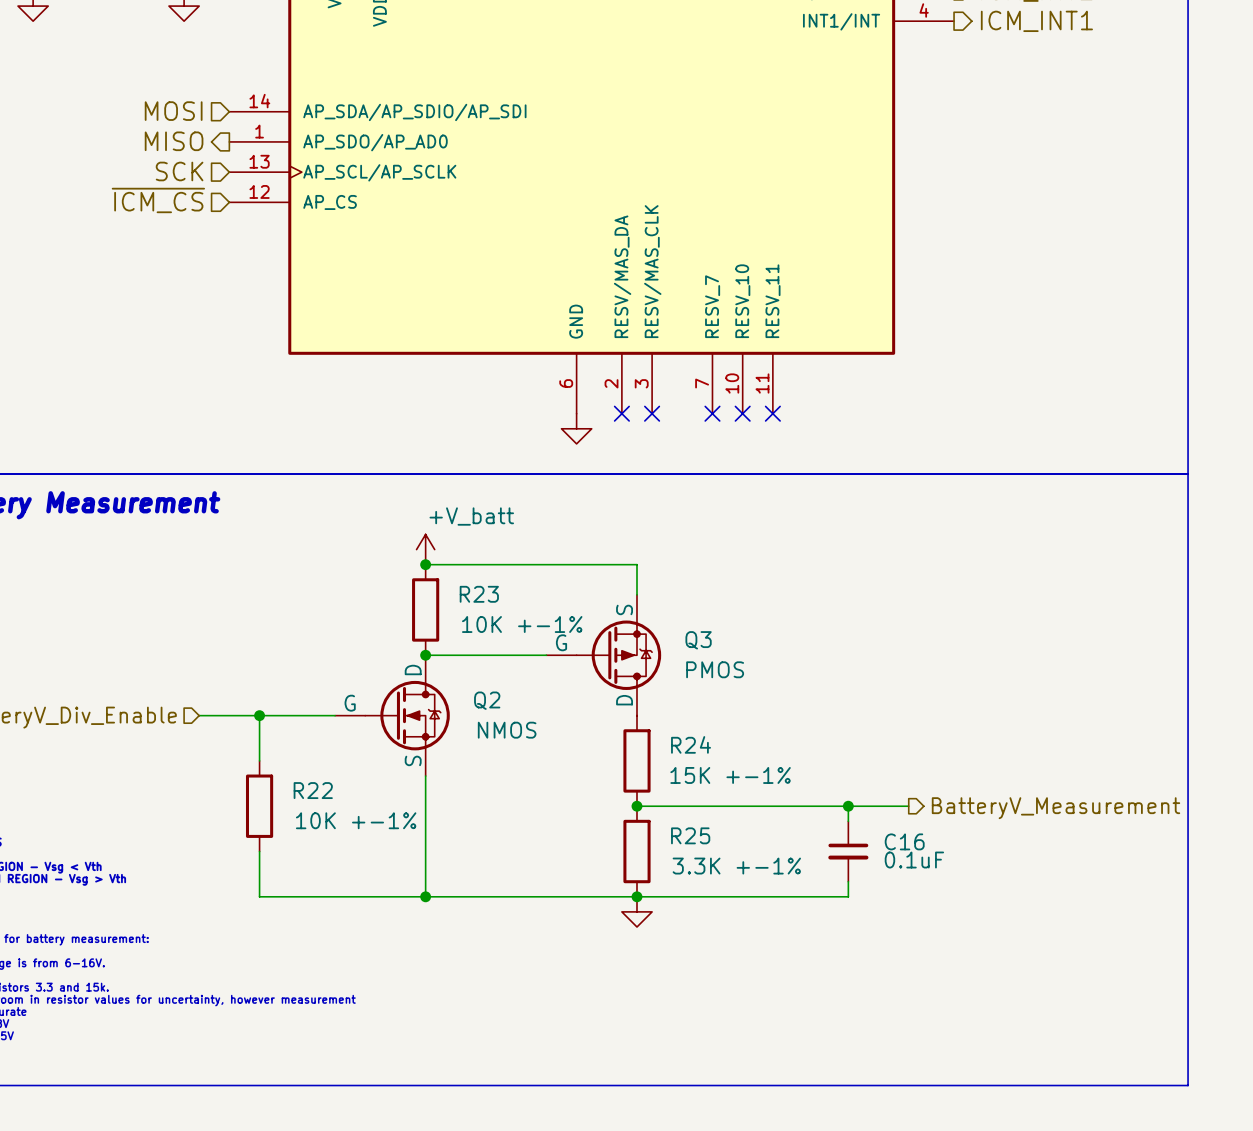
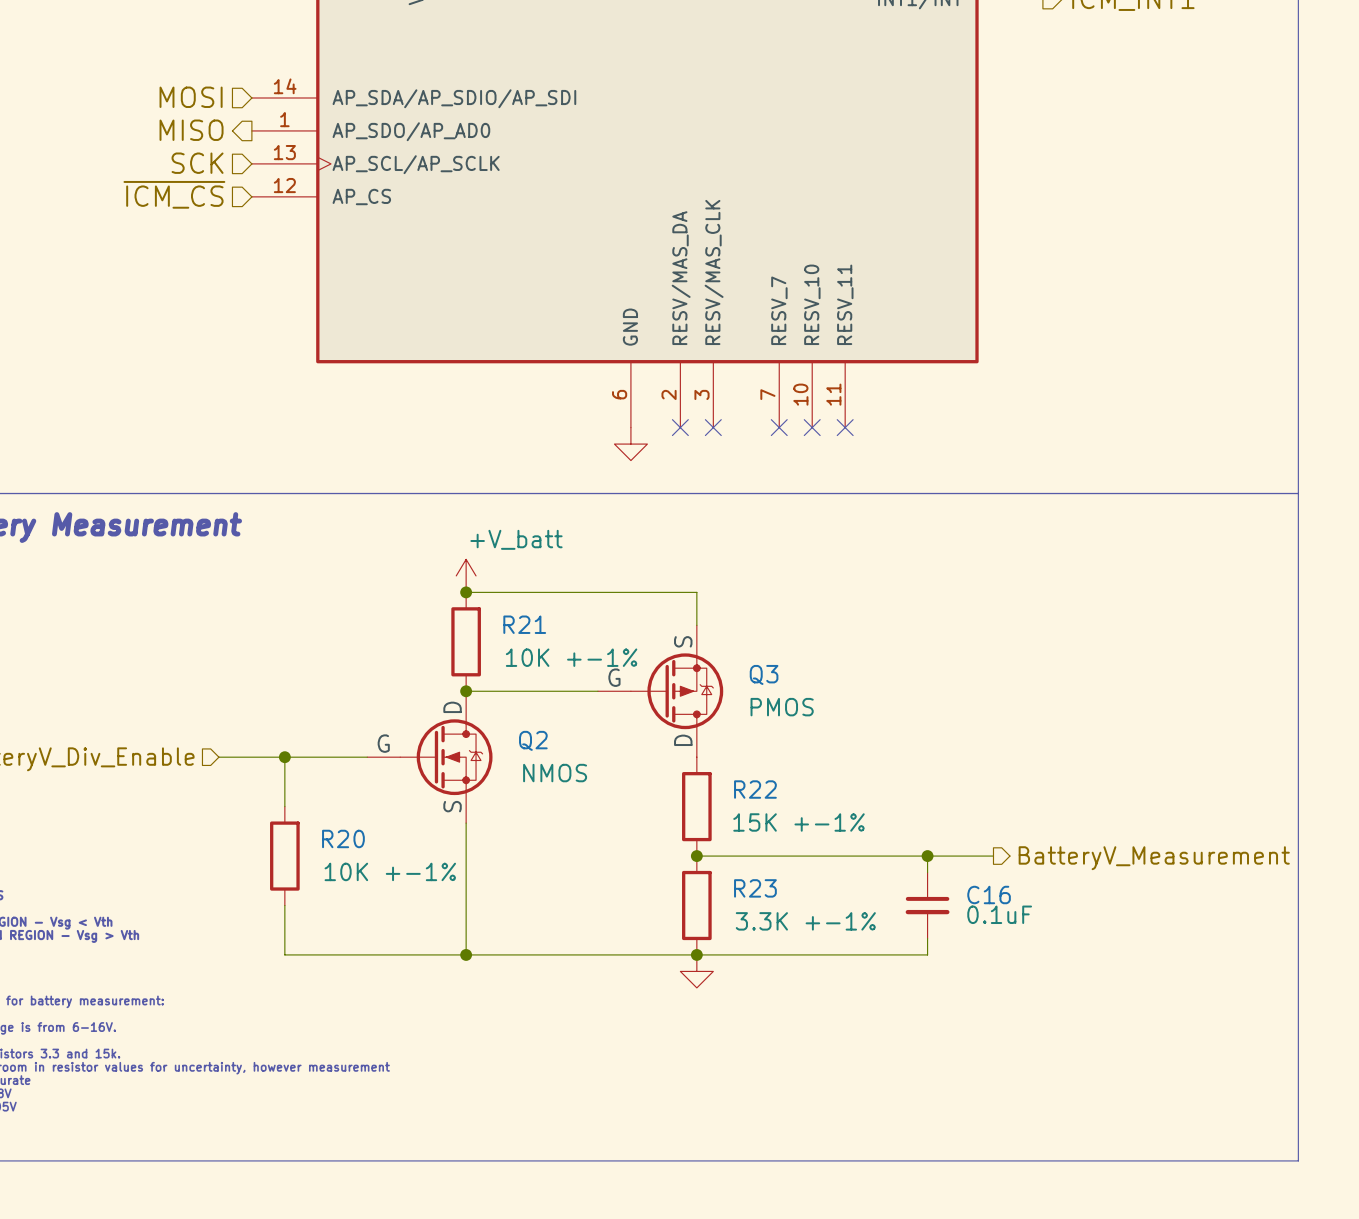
R23 name: R23 (479, 594) -> R21 (524, 624)
R24 name: R24 (691, 744) -> R22 (755, 789)
R22 name: R22 (313, 790) -> R20 (343, 838)
R25 name: R25 (690, 835) -> R23 (755, 888)

